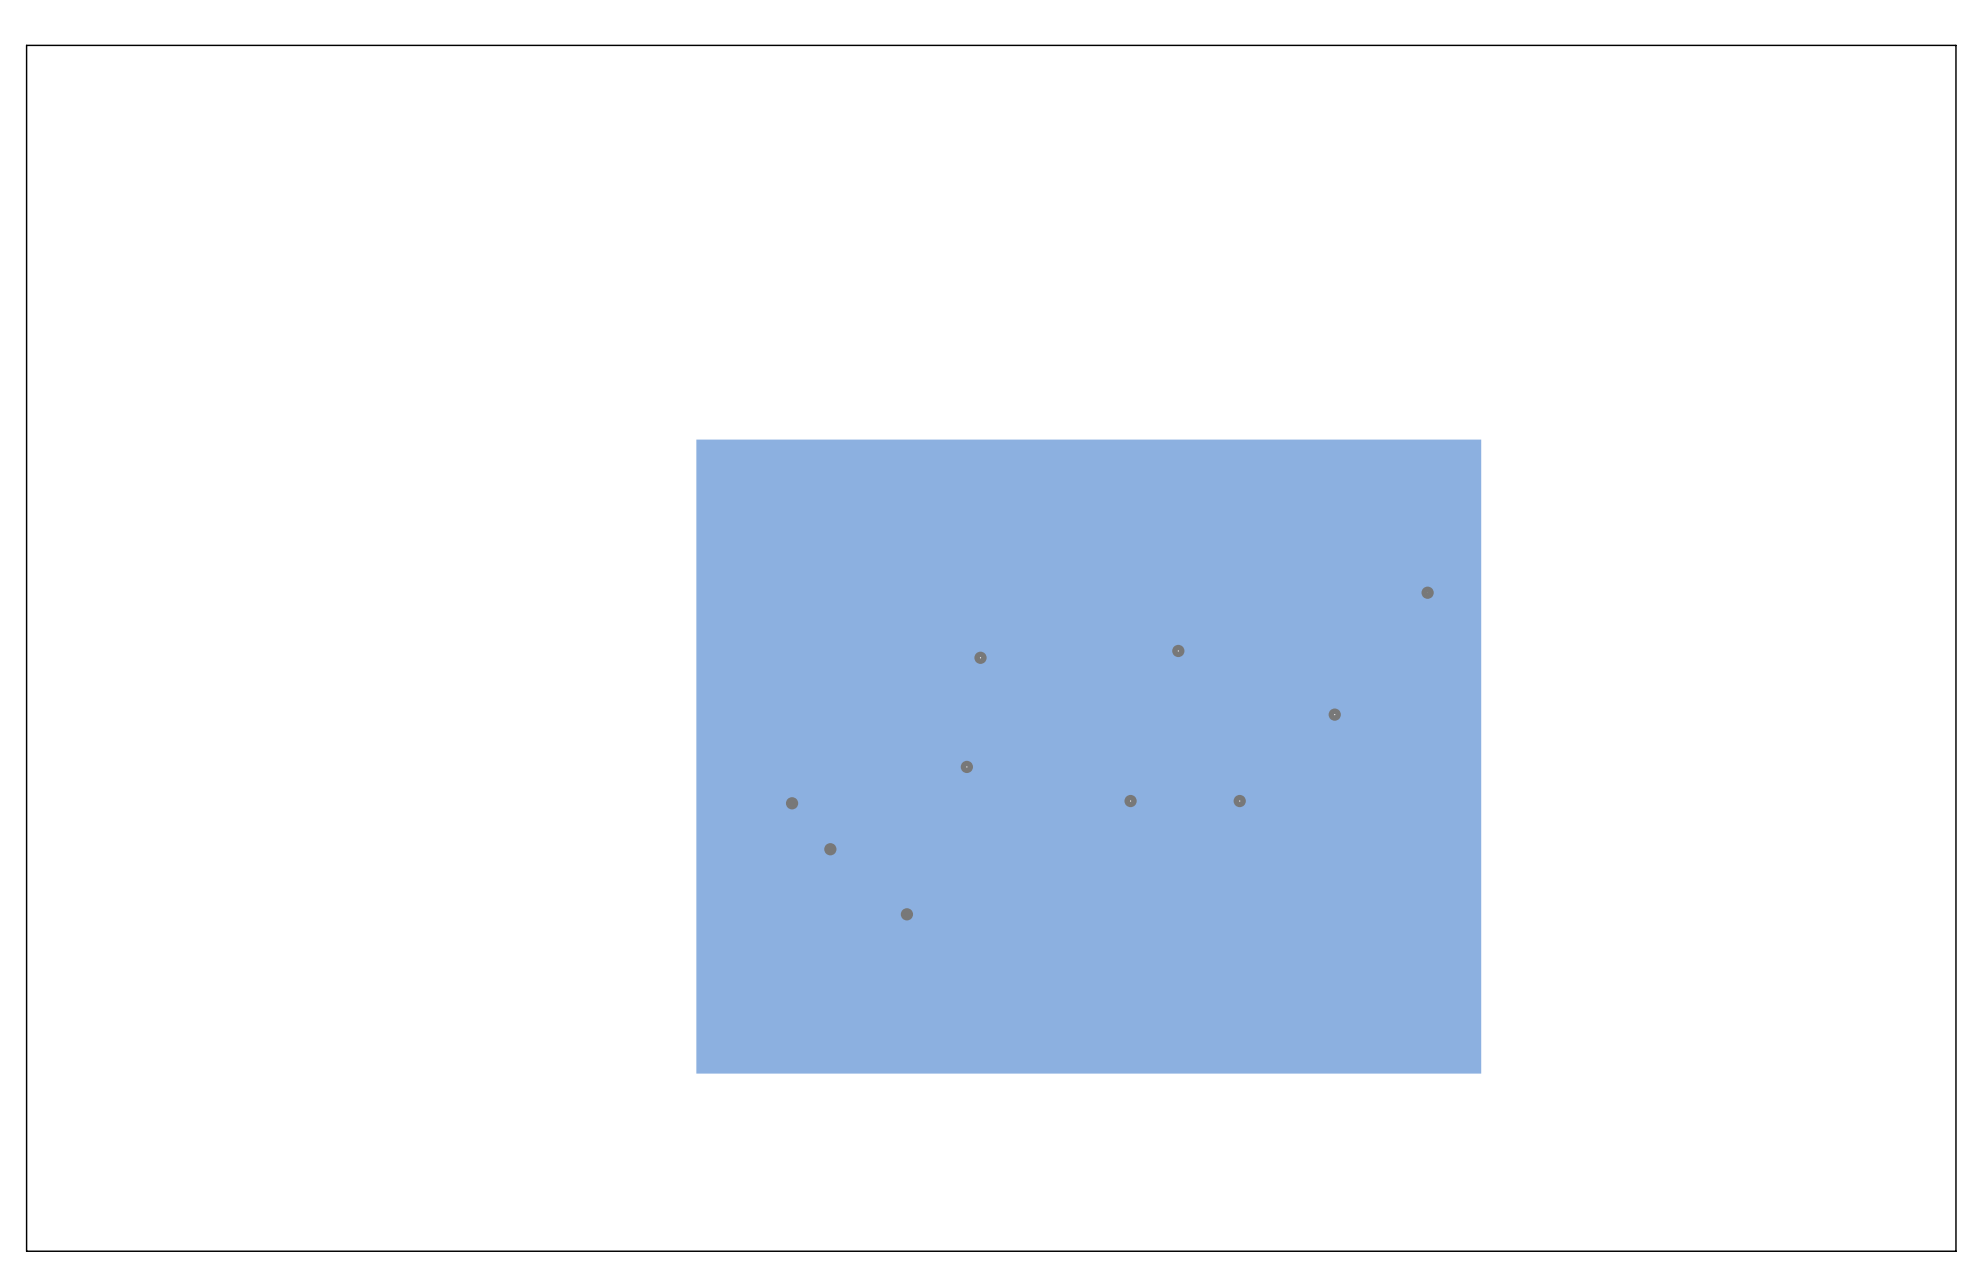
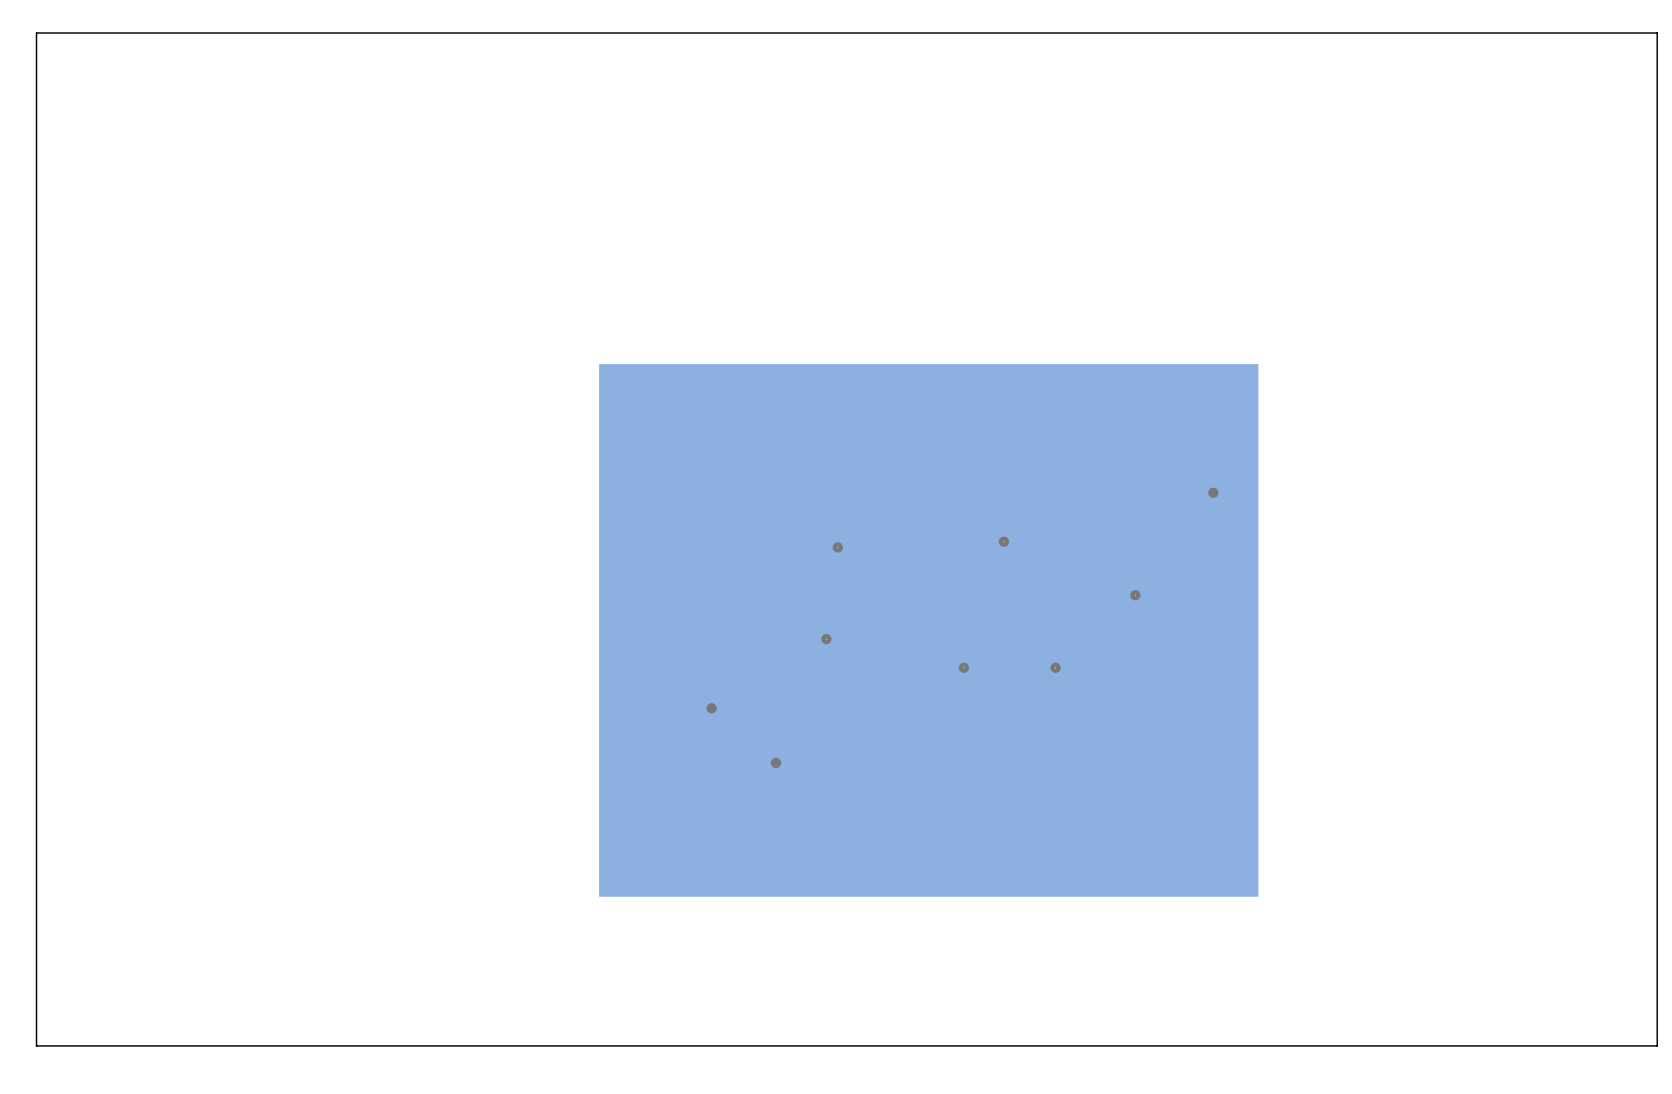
via: (792, 803) -> none

